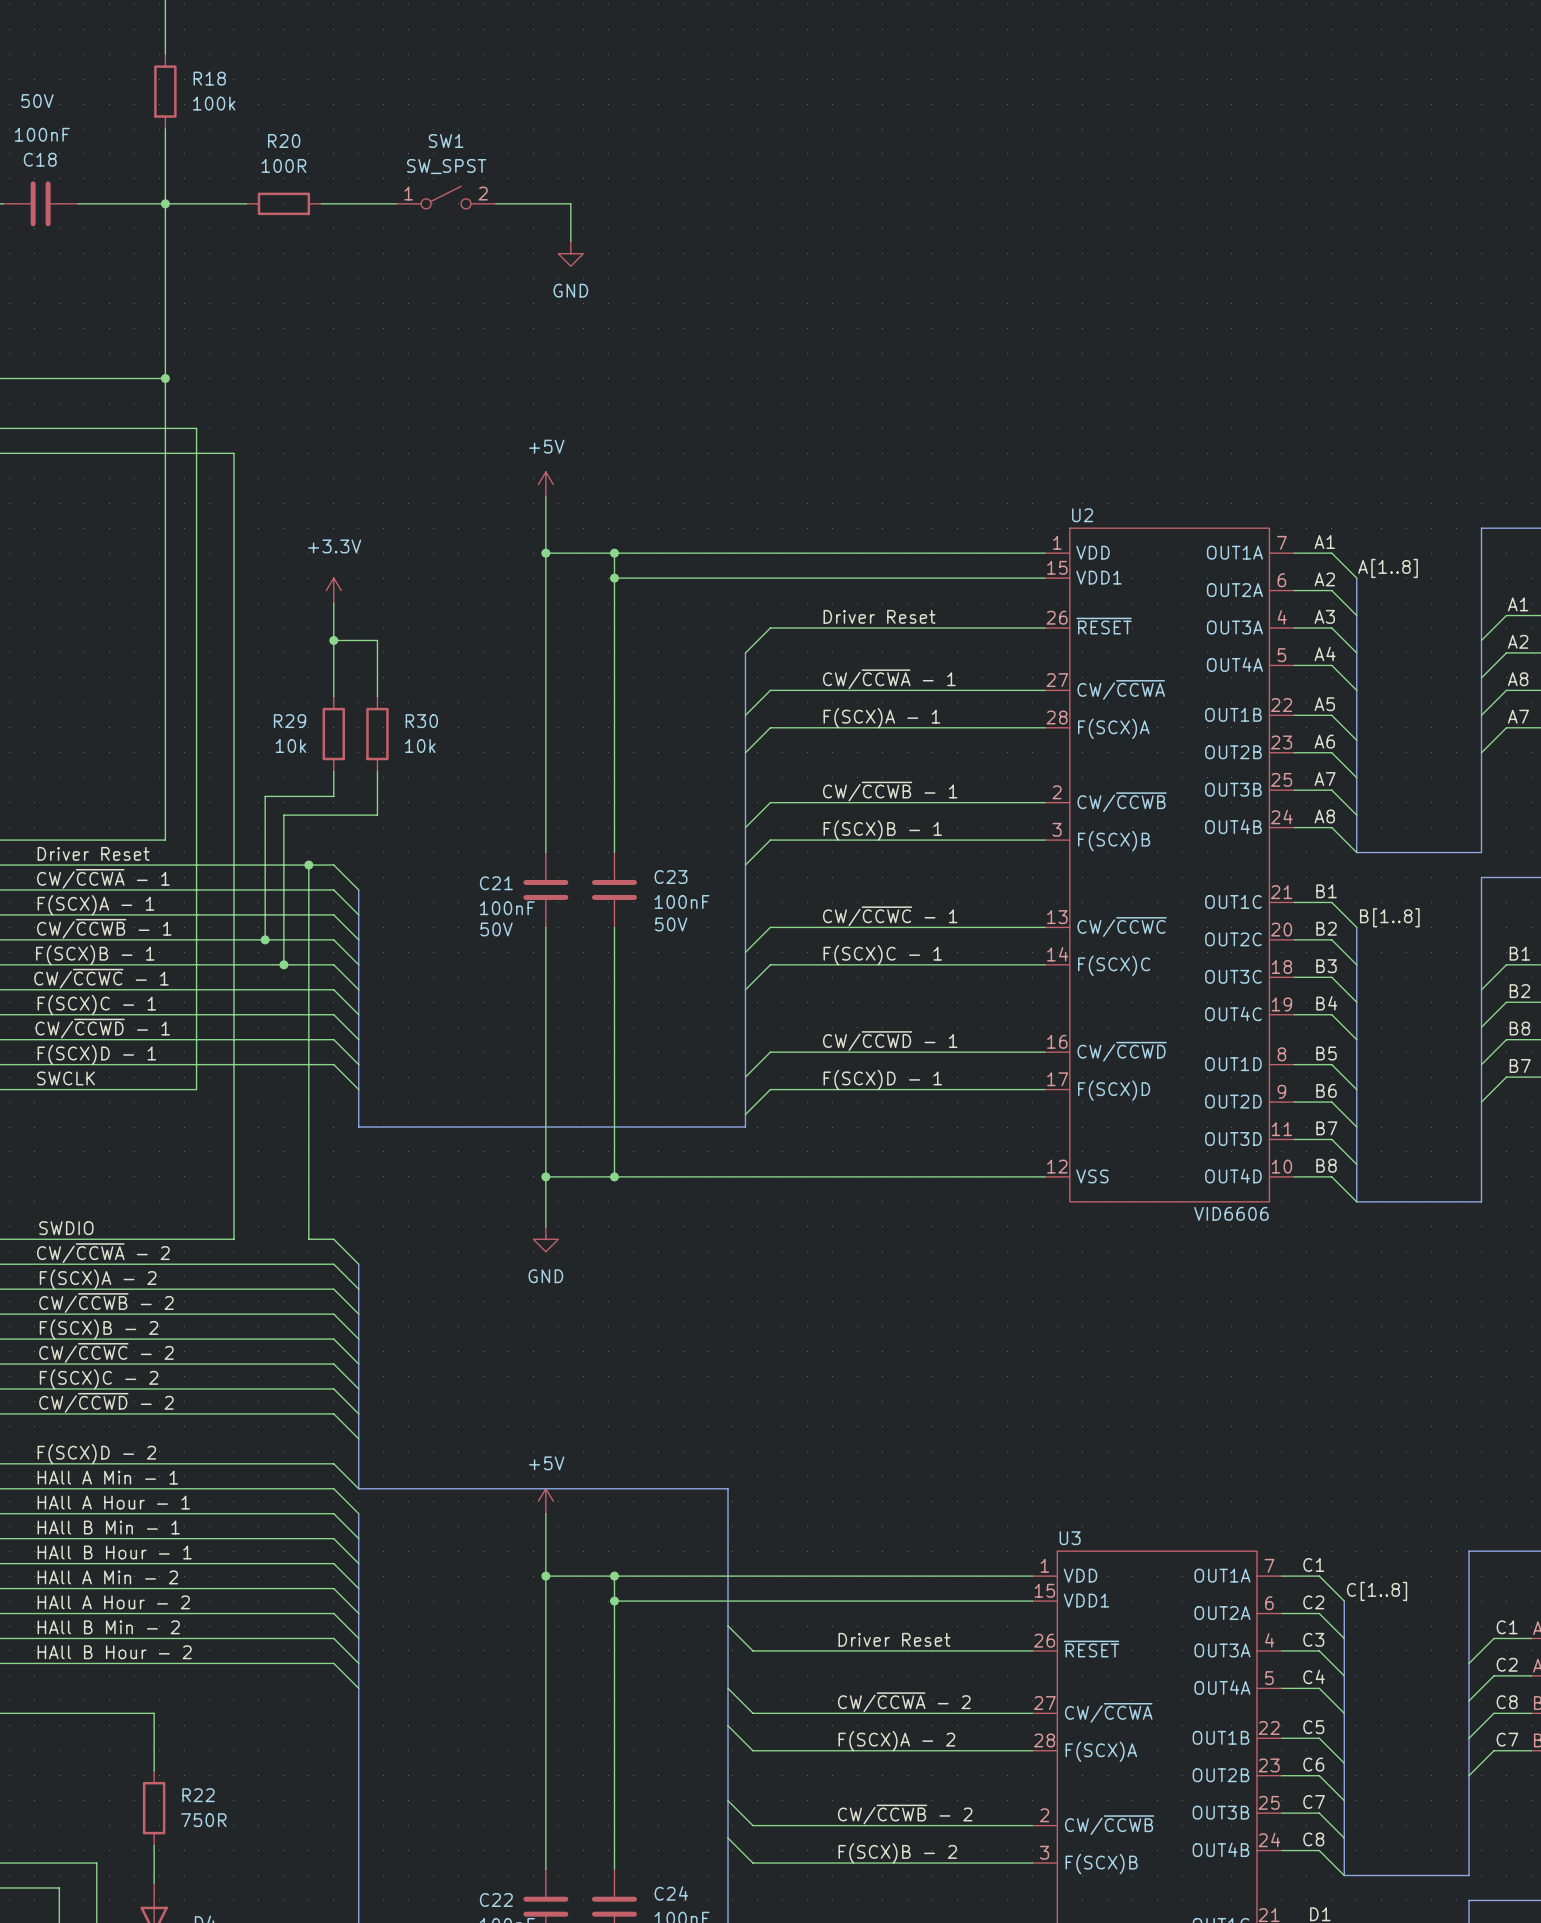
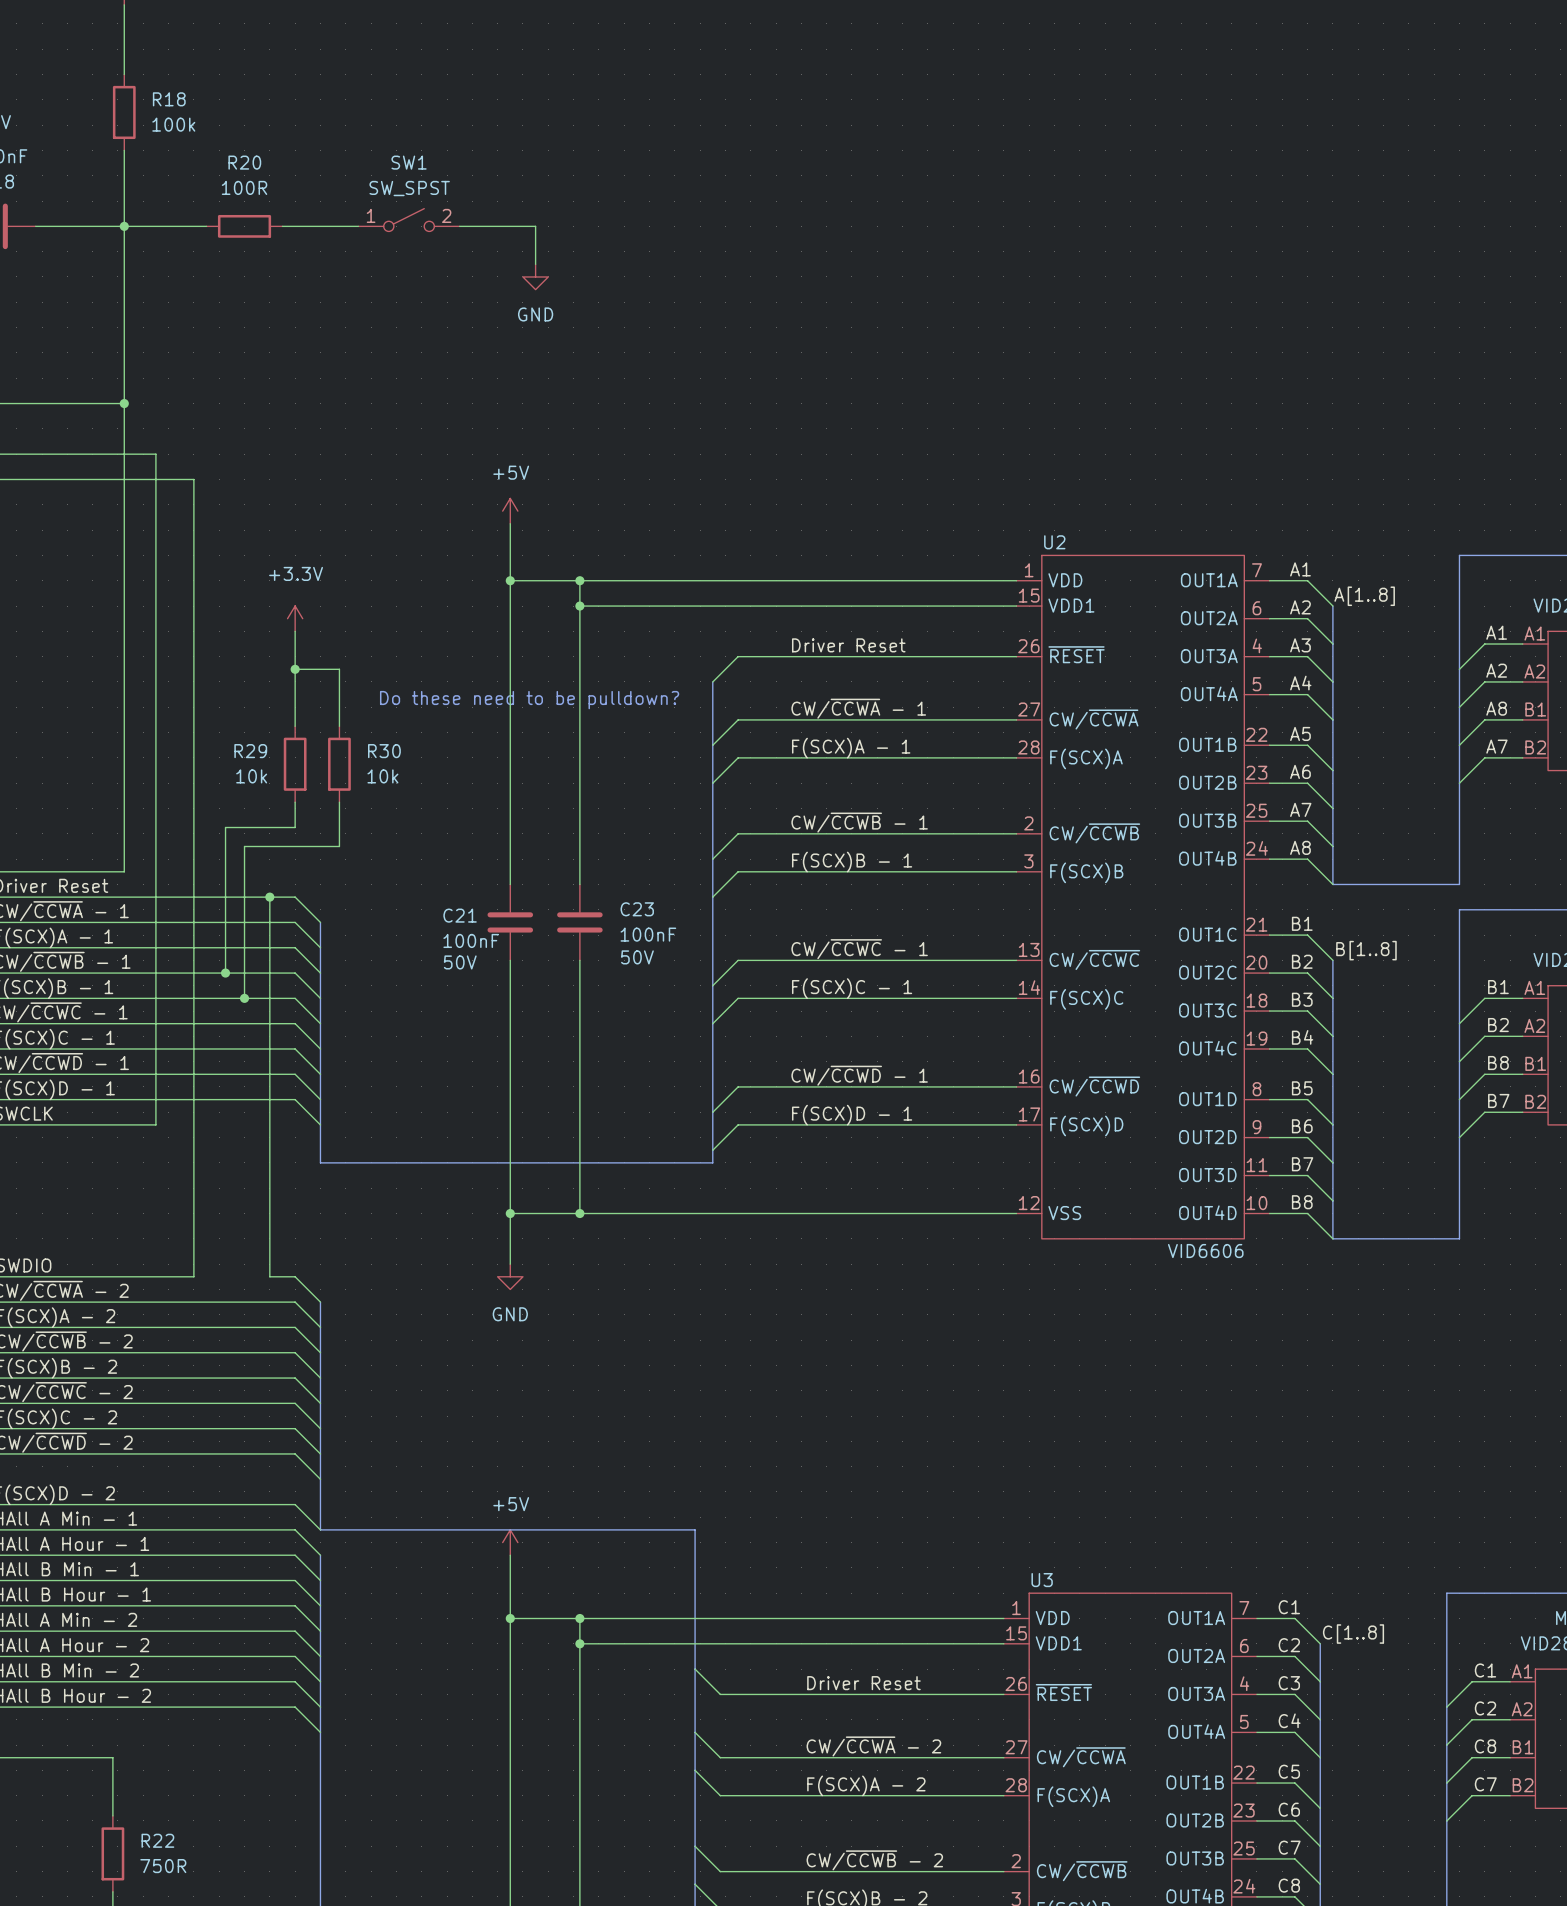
text: none -> Do these need to be pulldown? (529, 700)

